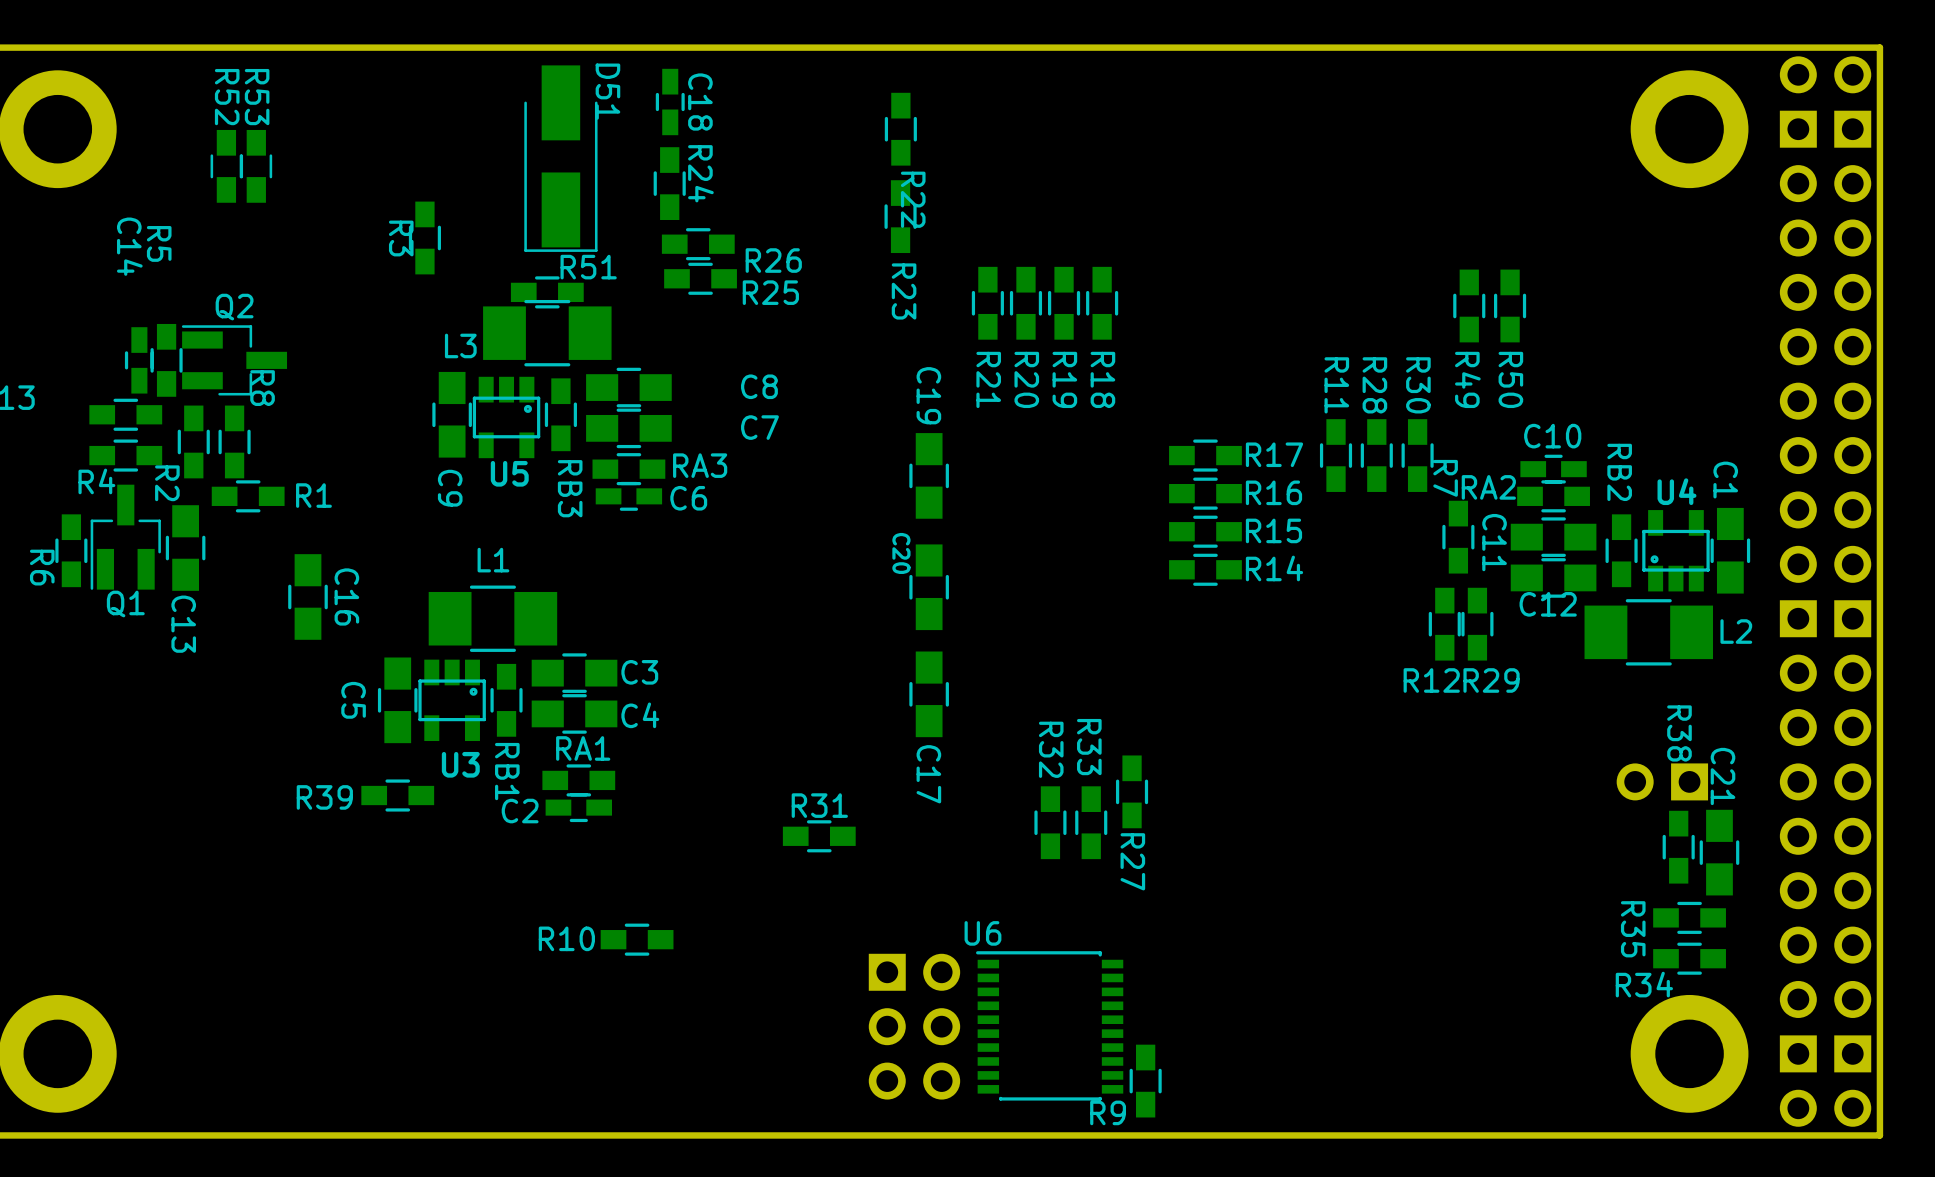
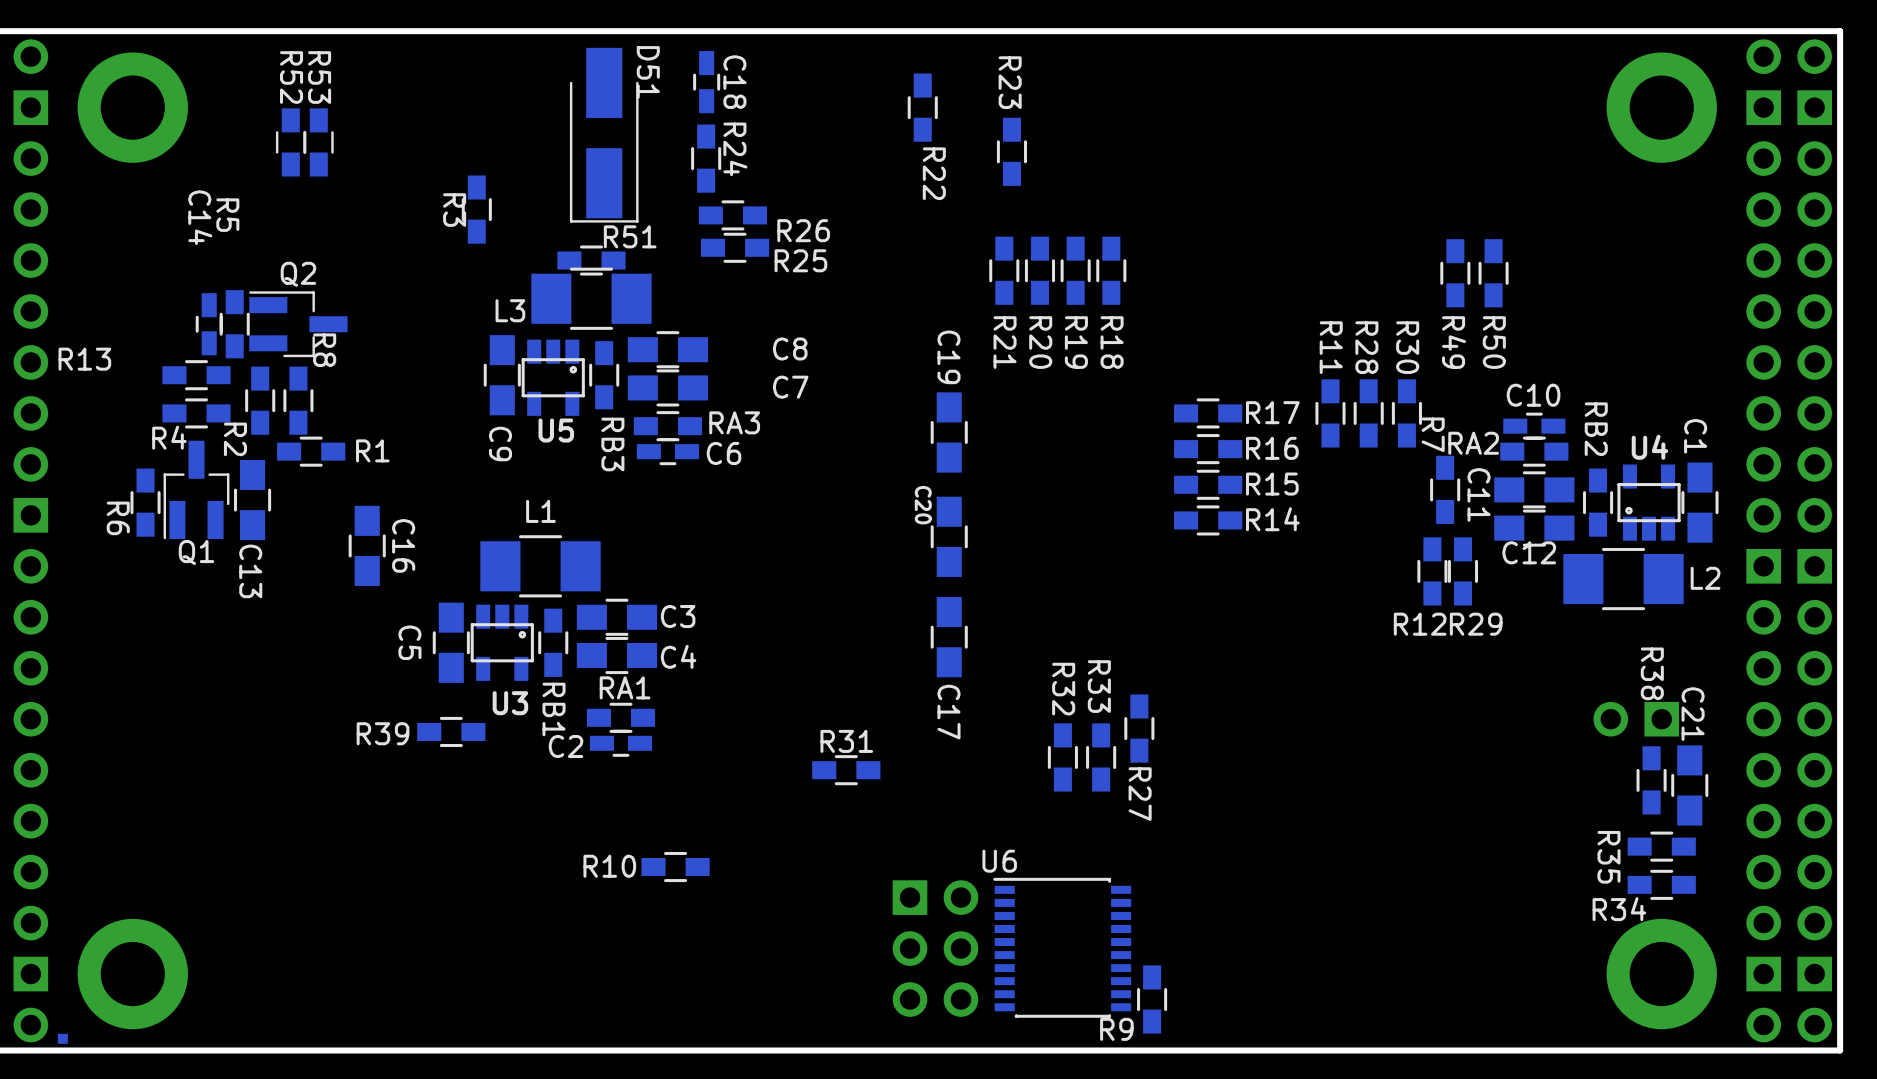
R23 position: (900, 216) -> (1011, 151)
R23 name position: R23 (904, 291) -> R23 (1010, 82)

